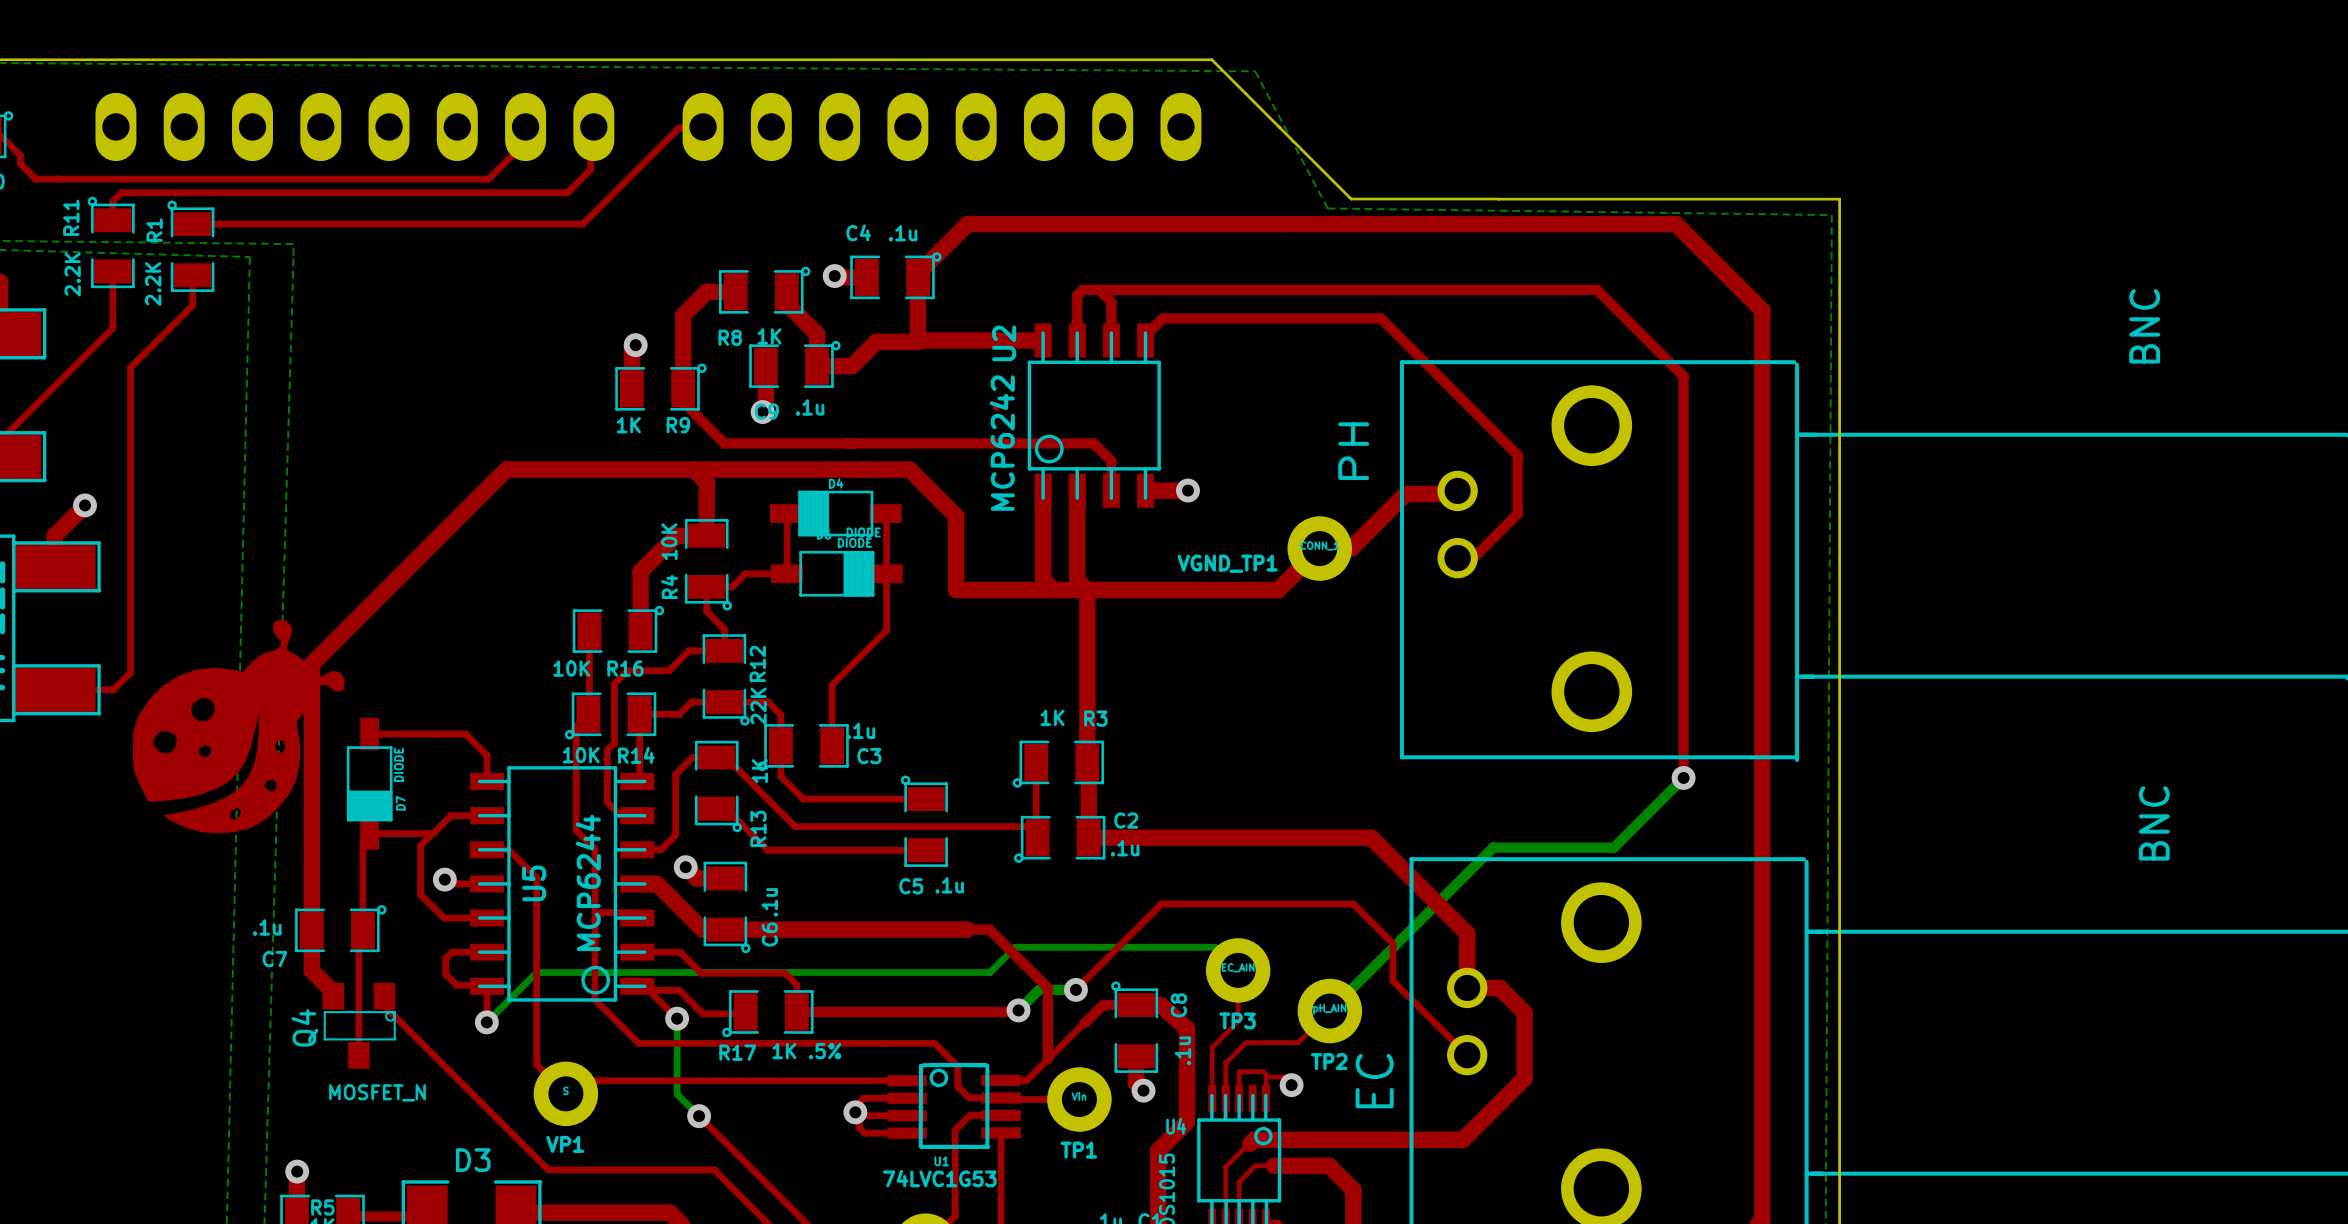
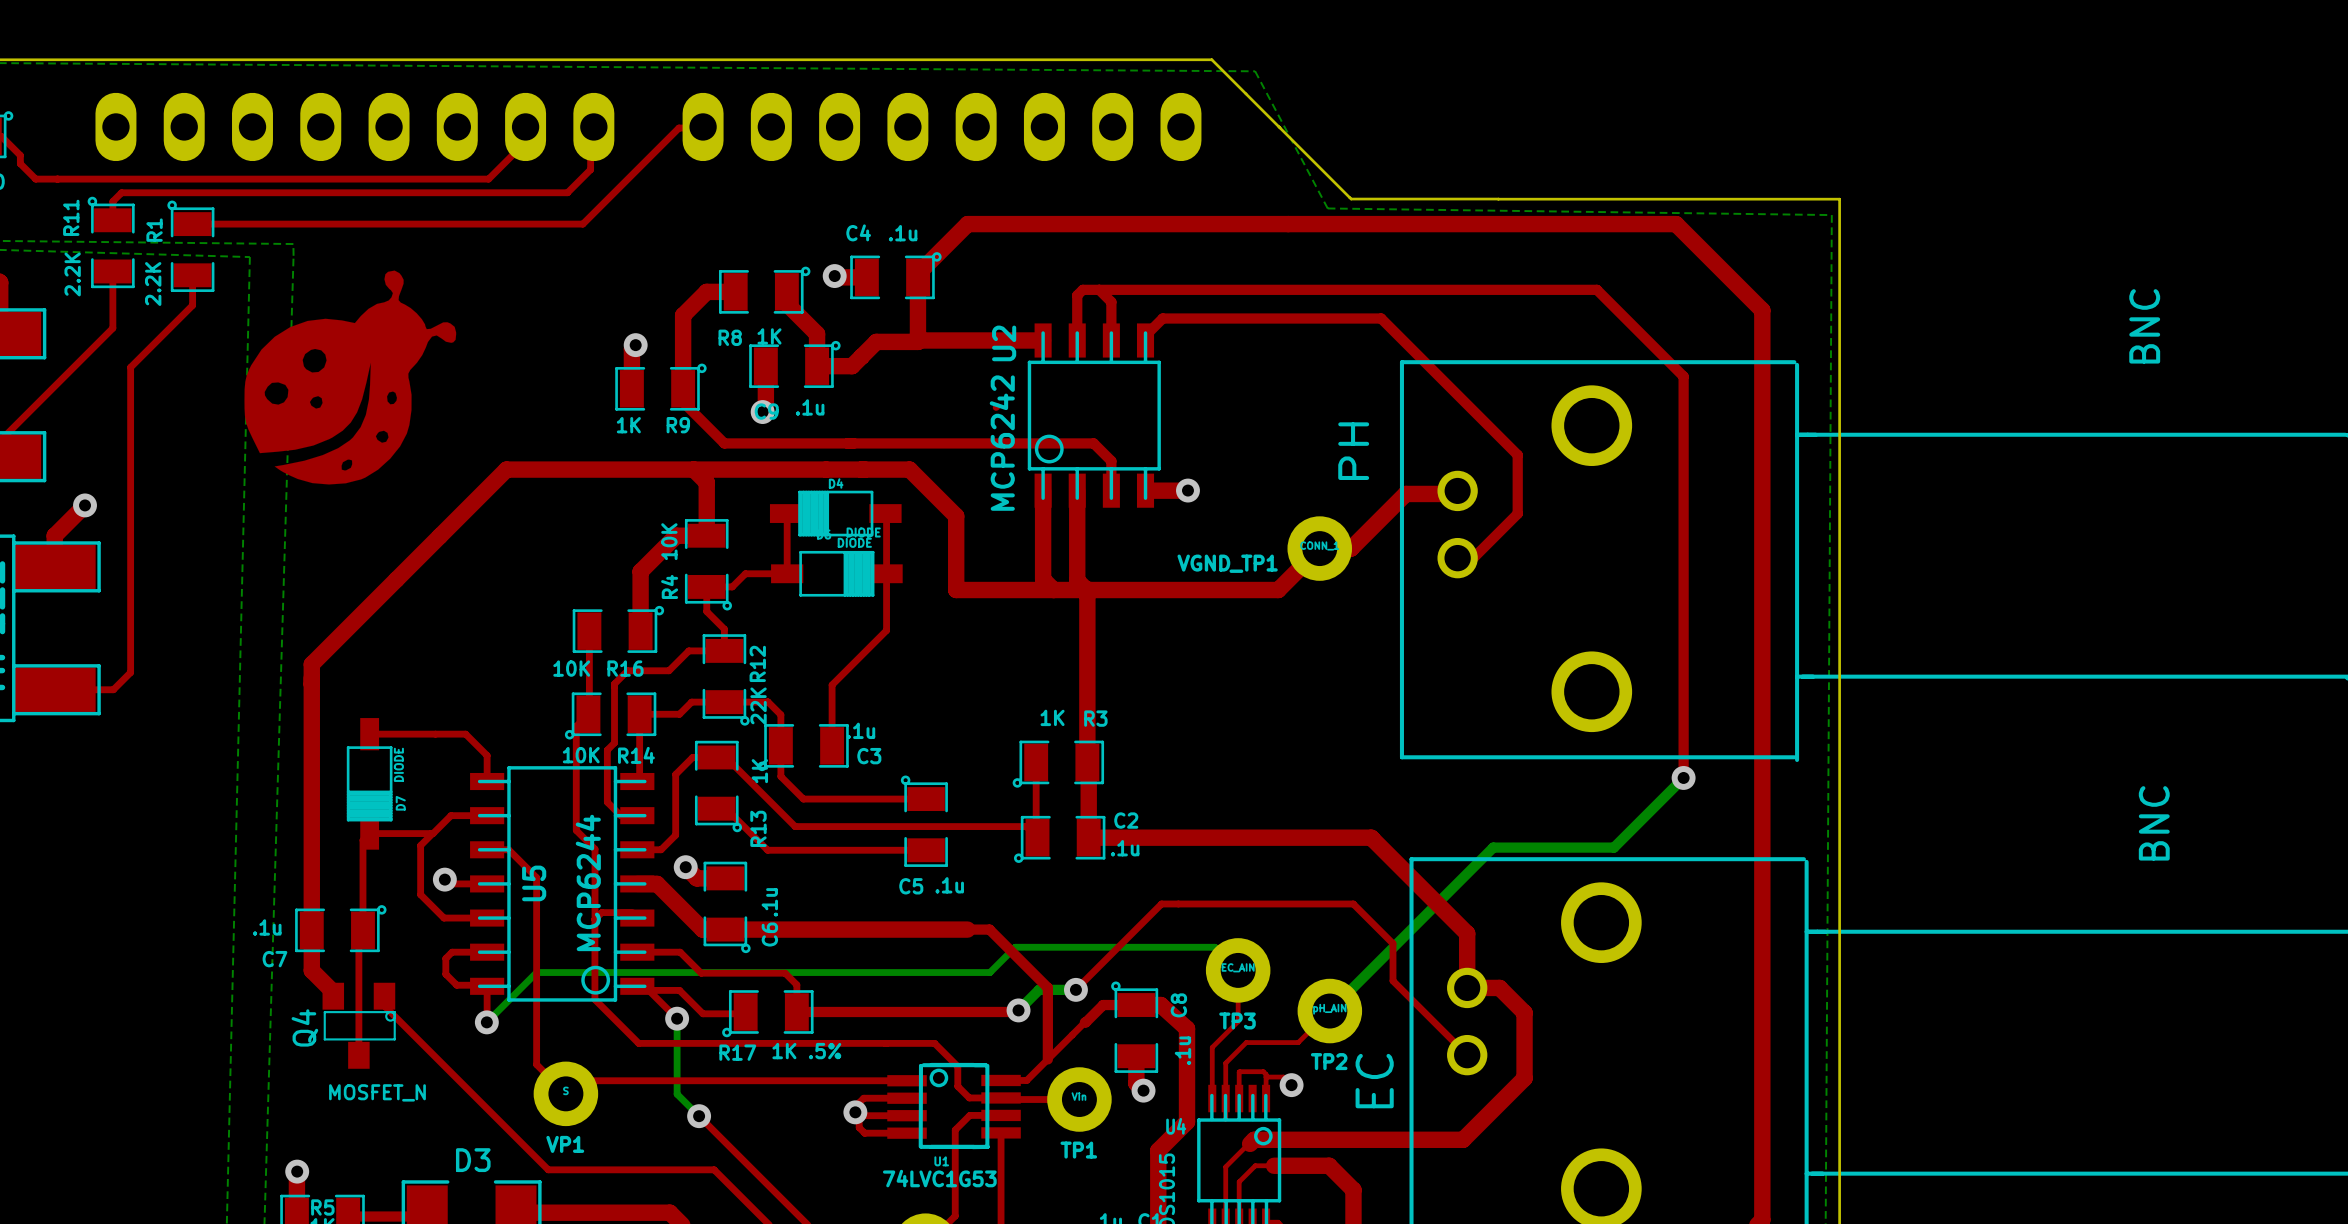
drawing position: (238, 726) -> (350, 377)

